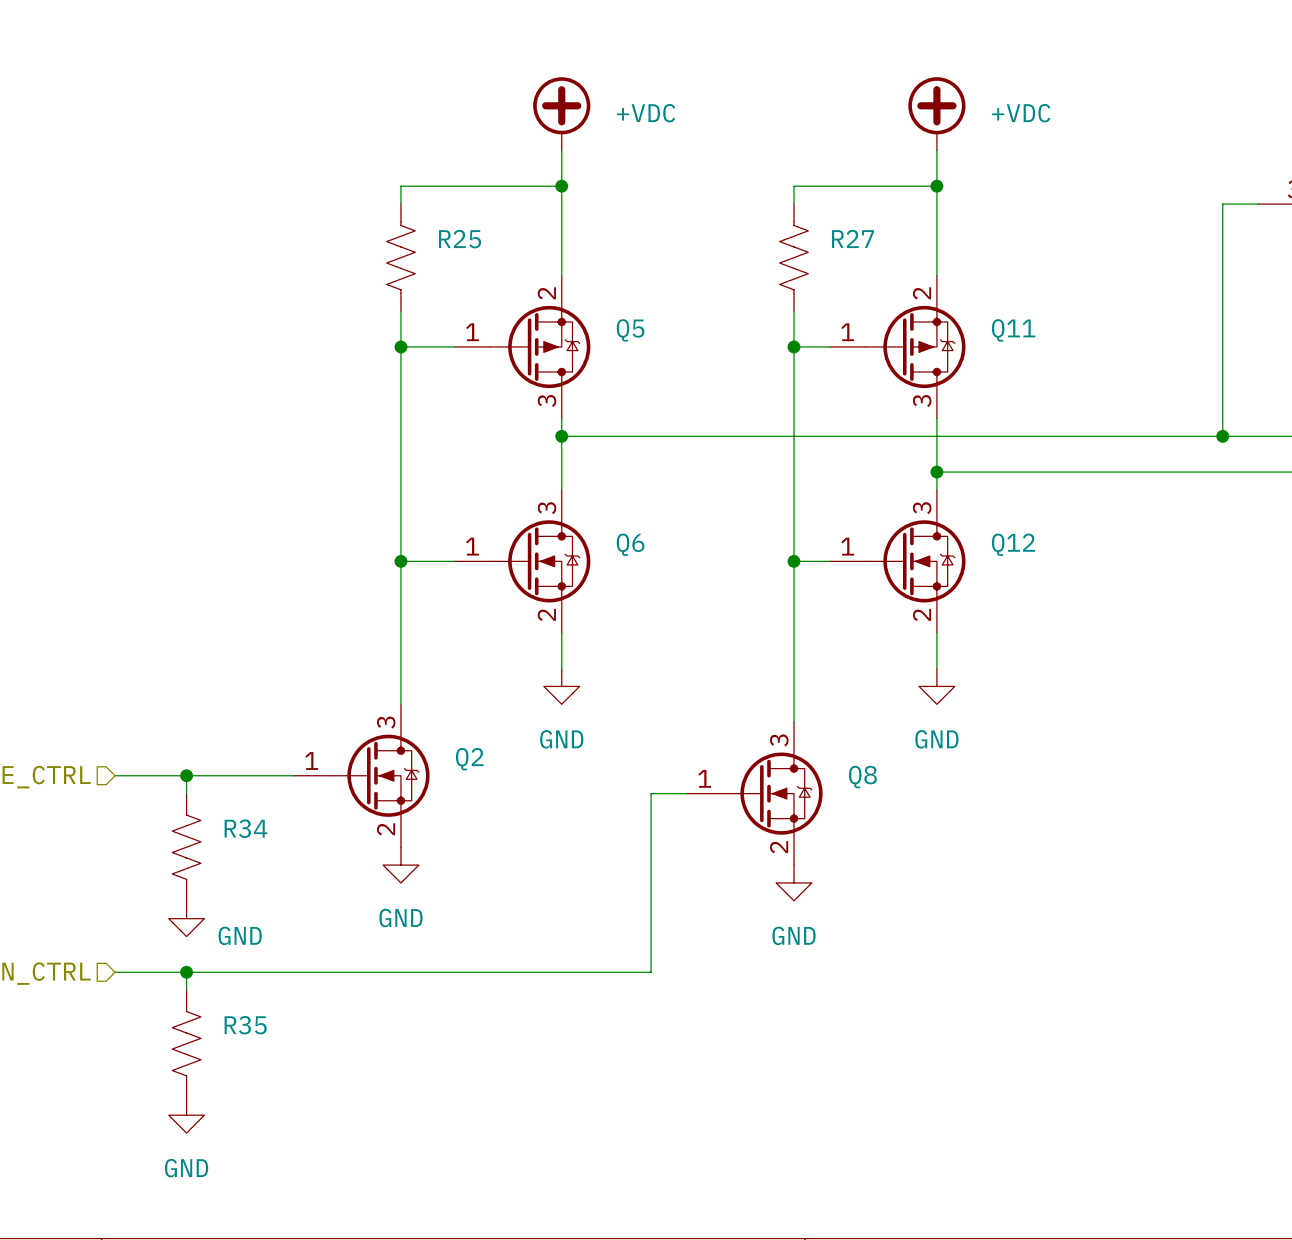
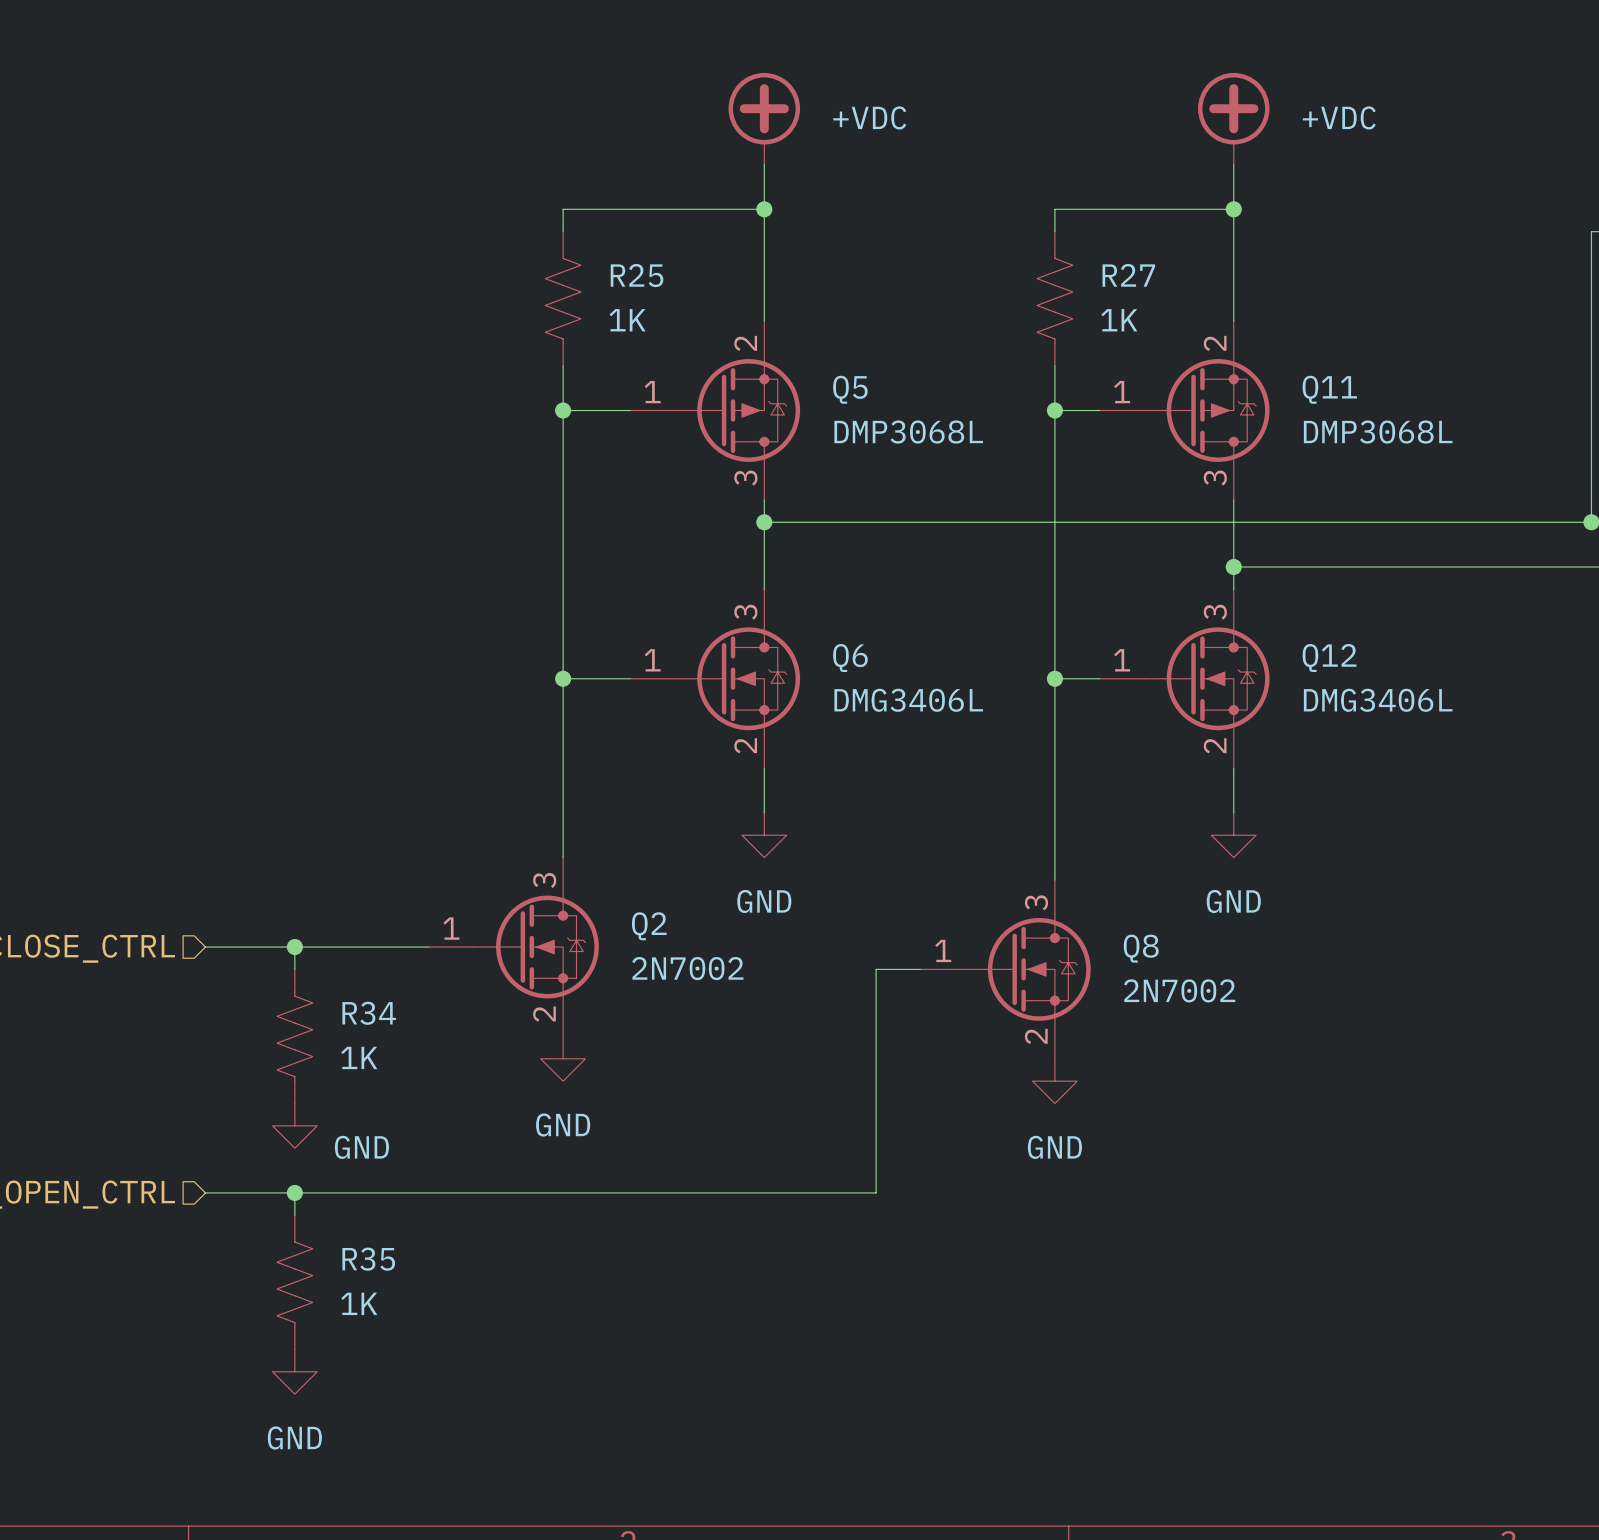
R25 value: none -> 1K (627, 320)
R27 value: none -> 1K (1119, 320)
Q5 value: none -> DMP3068L (908, 432)
Q11 value: none -> DMP3068L (1378, 432)
Q6 value: none -> DMG3406L (908, 700)
Q12 value: none -> DMG3406L (1378, 700)
Q2 value: none -> 2N7002 (687, 968)
Q8 value: none -> 2N7002 (1179, 990)
R34 value: none -> 1K (359, 1057)
R35 value: none -> 1K (359, 1303)

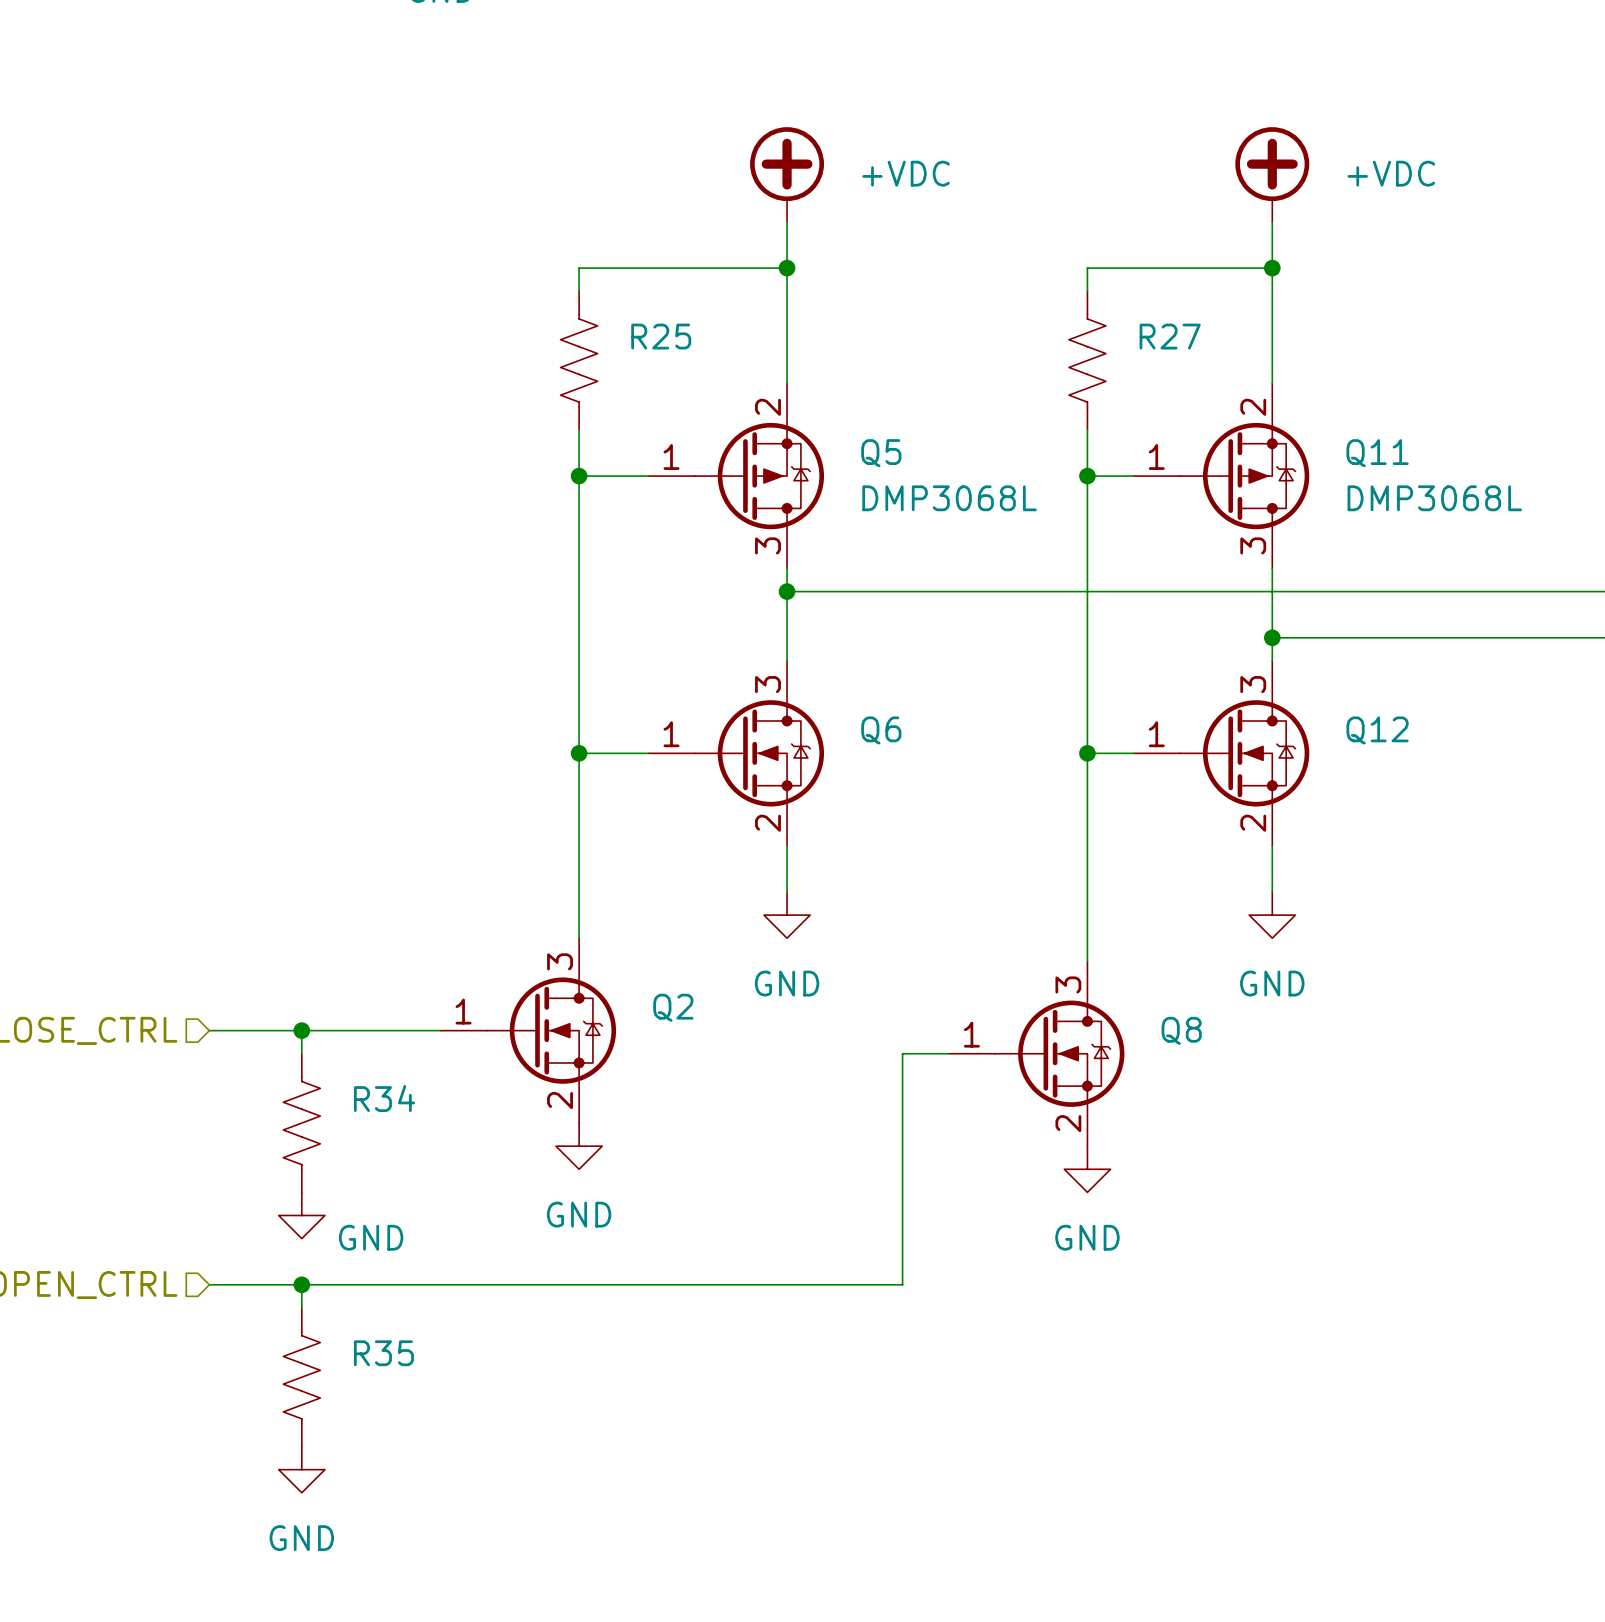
R25 value: 1K (627, 320) -> none
R27 value: 1K (1119, 320) -> none
Q6 value: DMG3406L (908, 700) -> none
Q12 value: DMG3406L (1378, 700) -> none
Q2 value: 2N7002 (687, 968) -> none
Q8 value: 2N7002 (1179, 990) -> none
R34 value: 1K (359, 1057) -> none
R35 value: 1K (359, 1303) -> none

